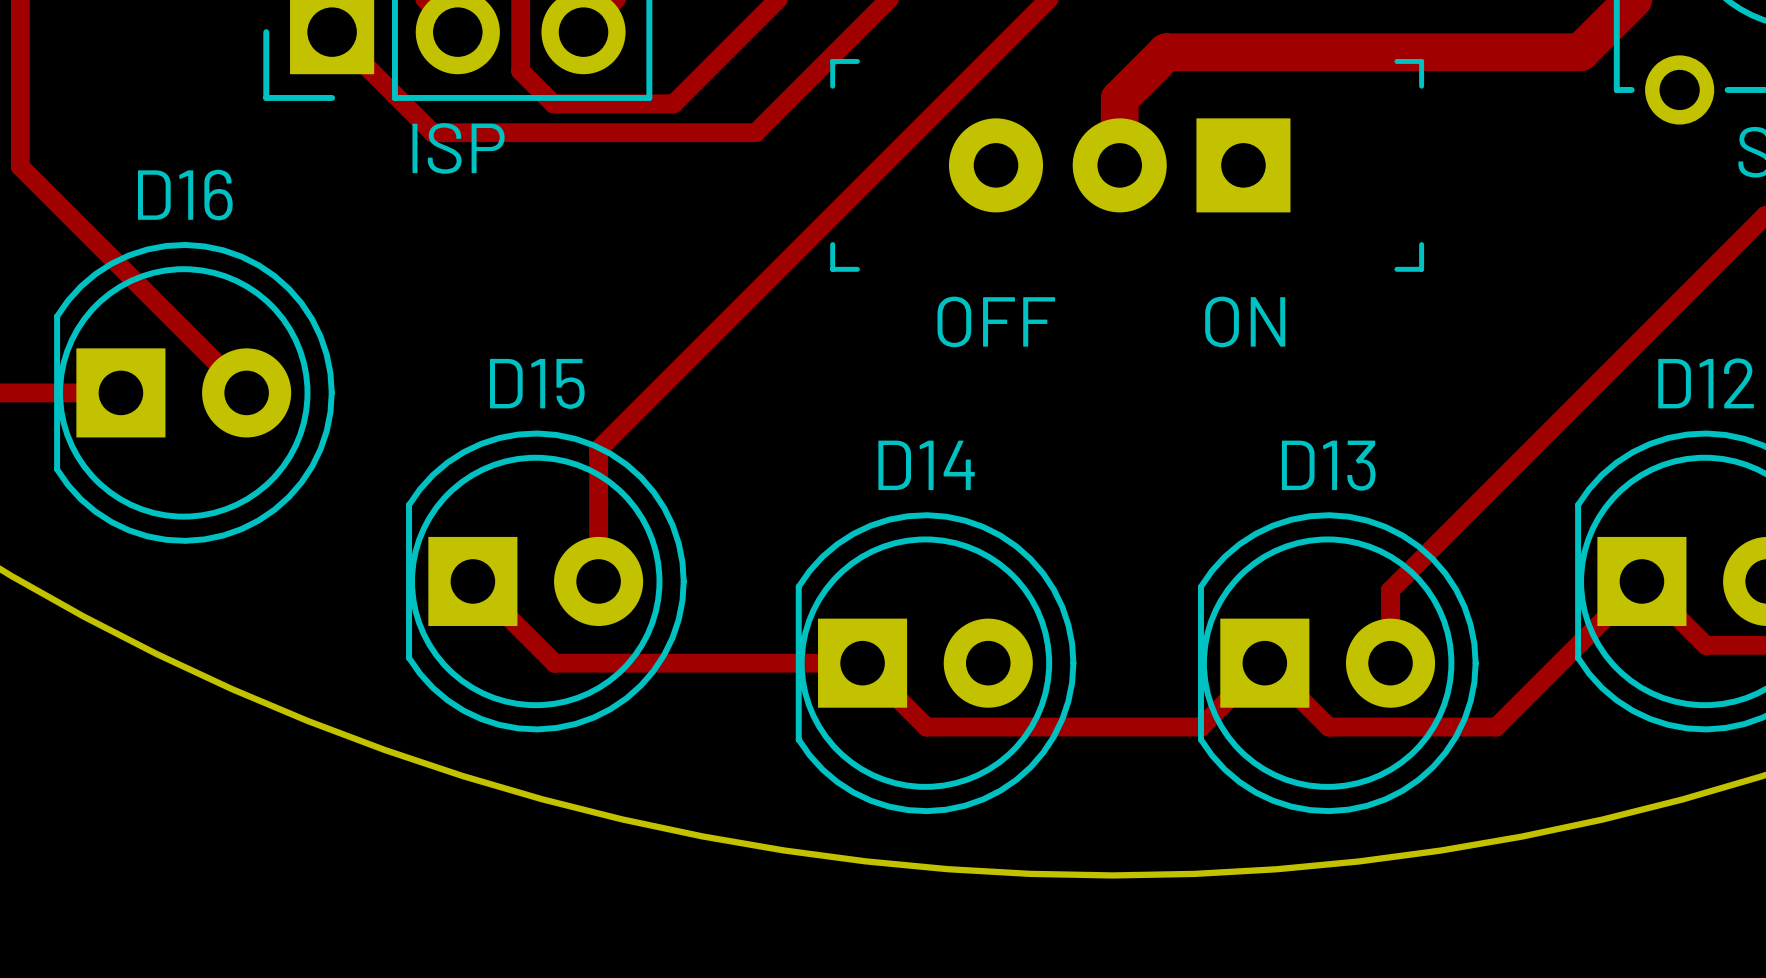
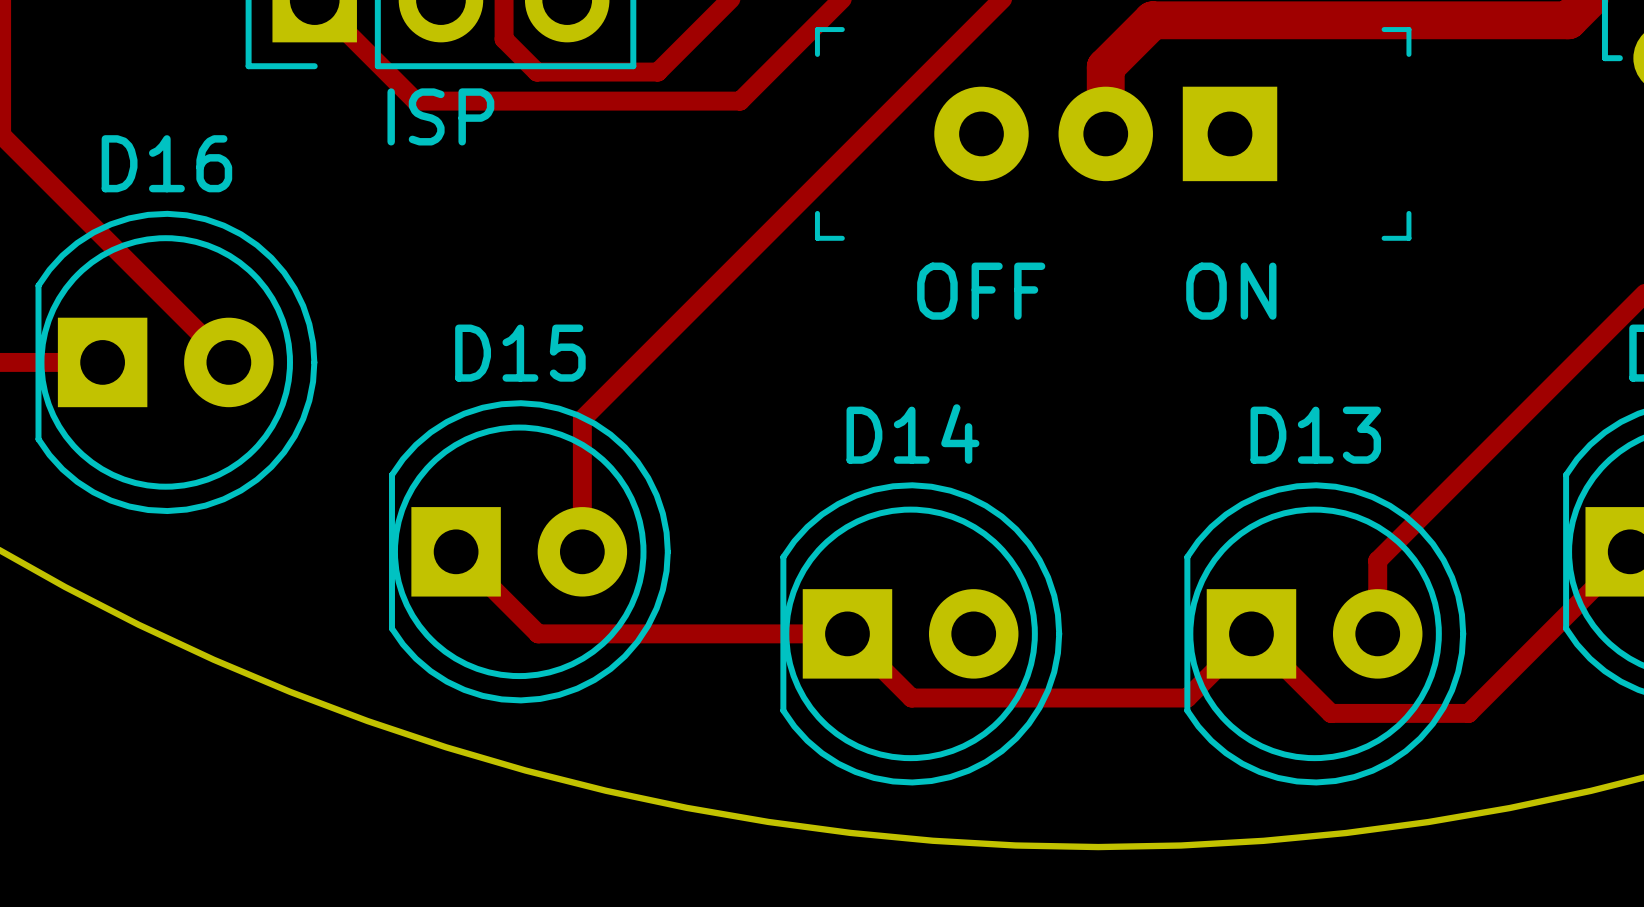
track: (1328, 727) (1496, 727) -> (1315, 698) (1331, 713) (1468, 713) (1484, 698)

